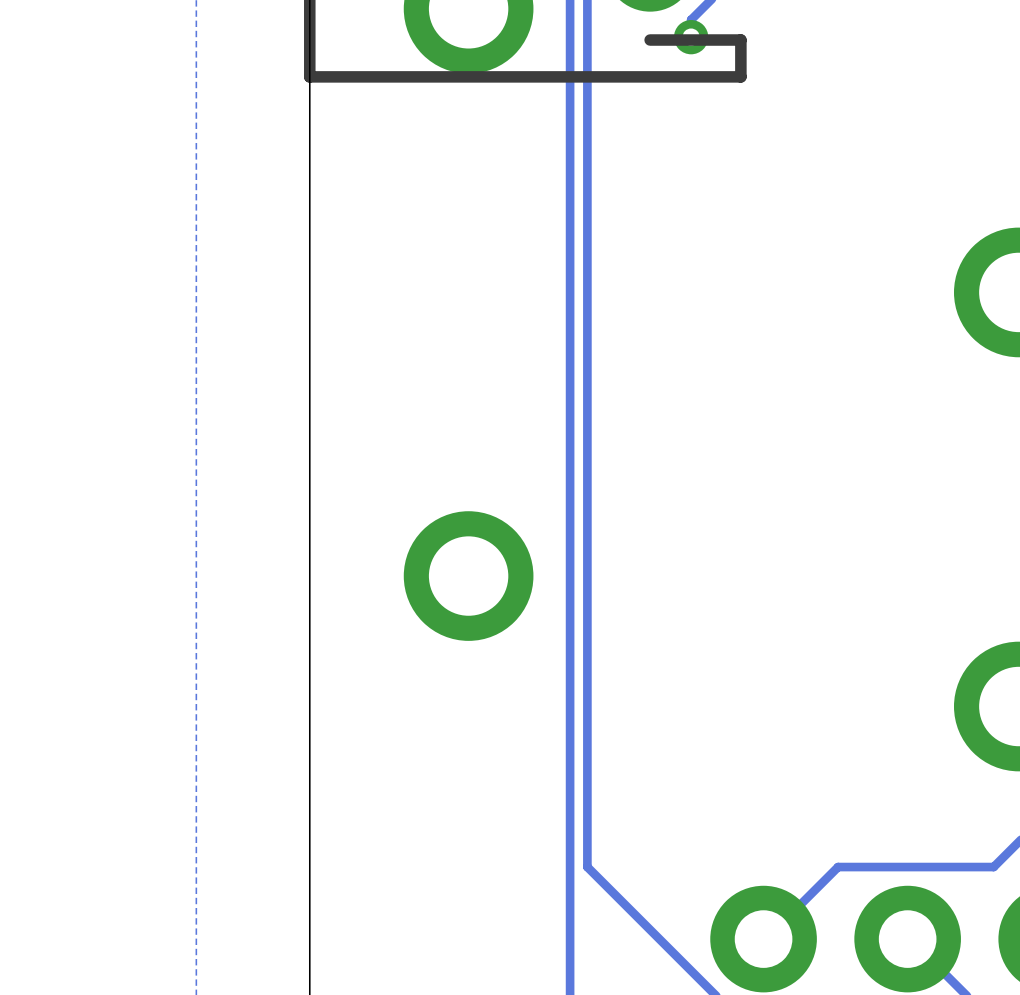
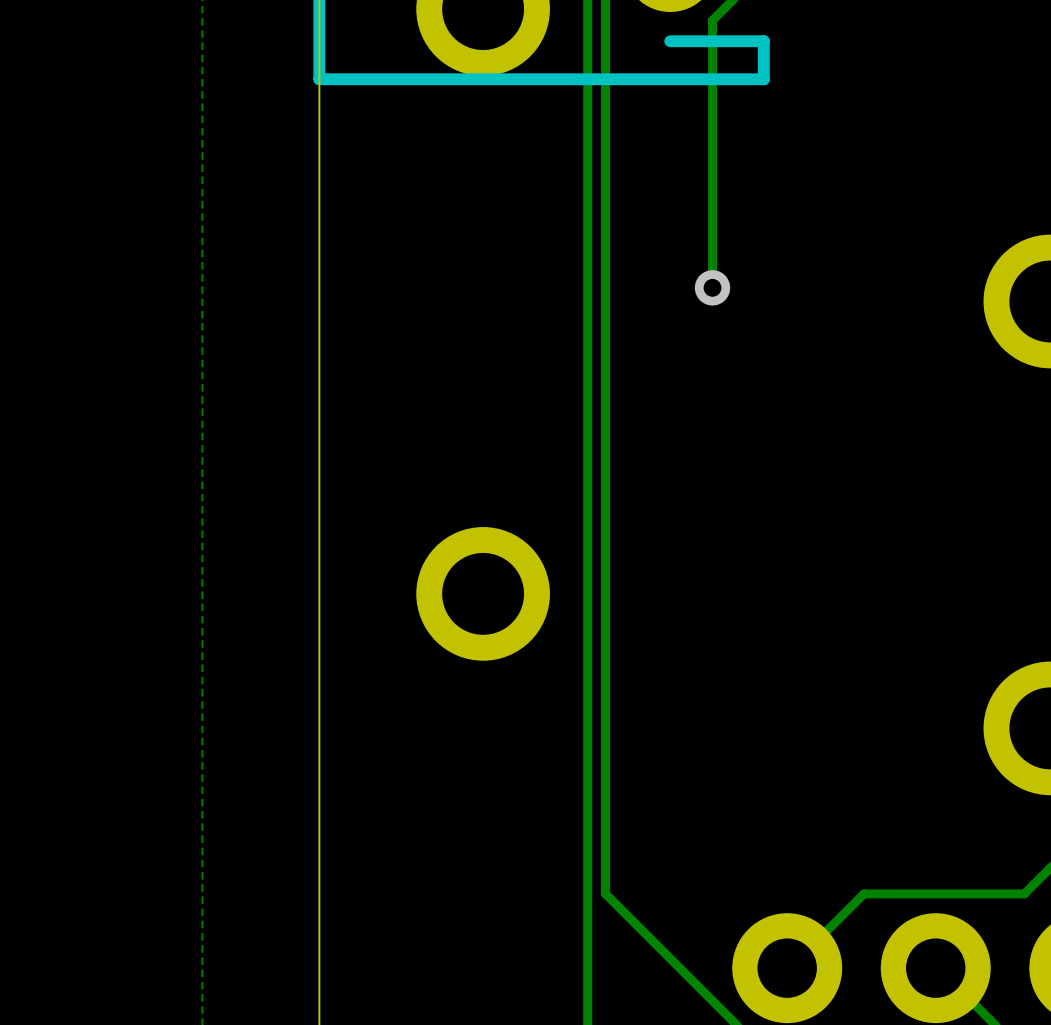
track: none -> (712, 38) (712, 287)
via position: (691, 37) -> (712, 287)

